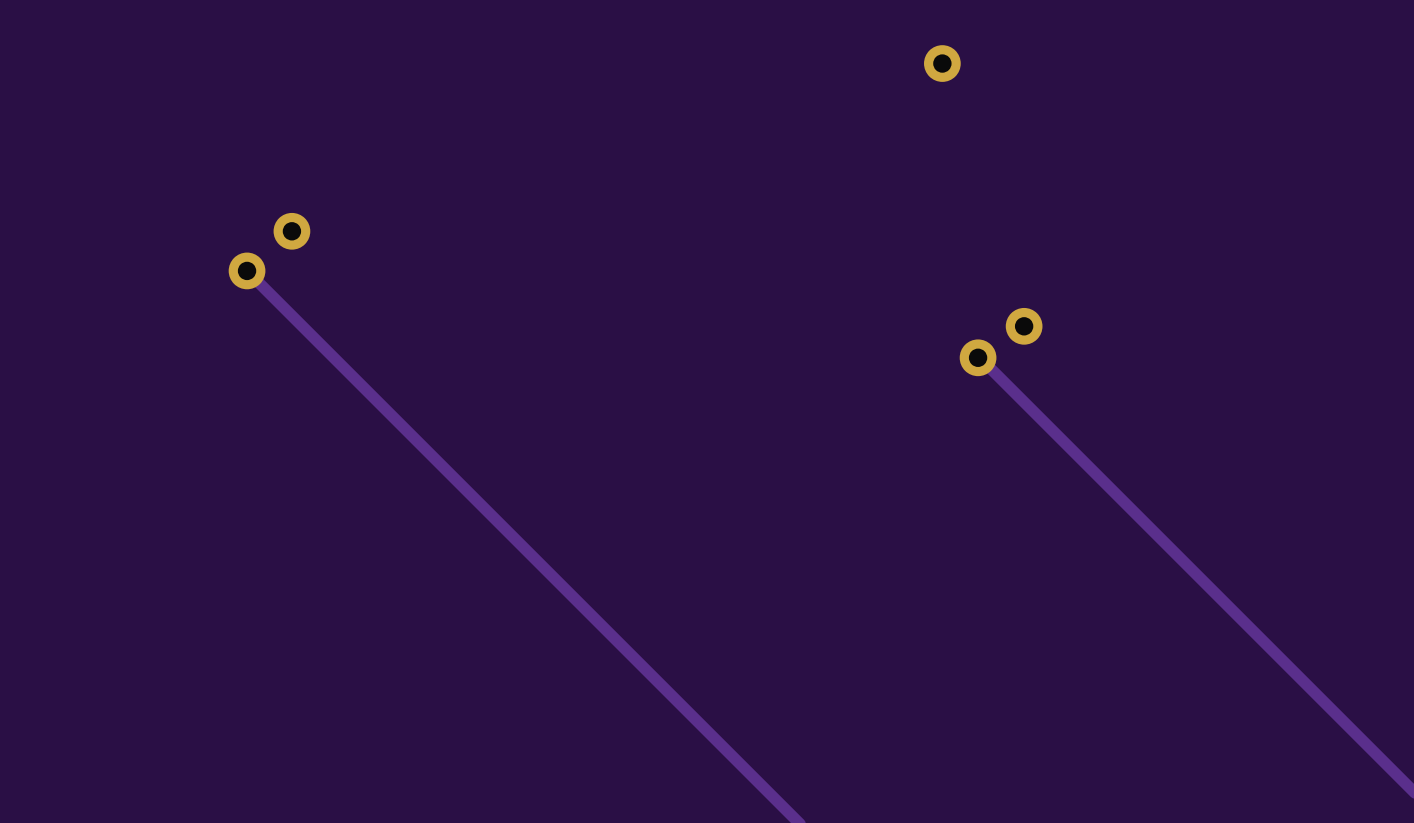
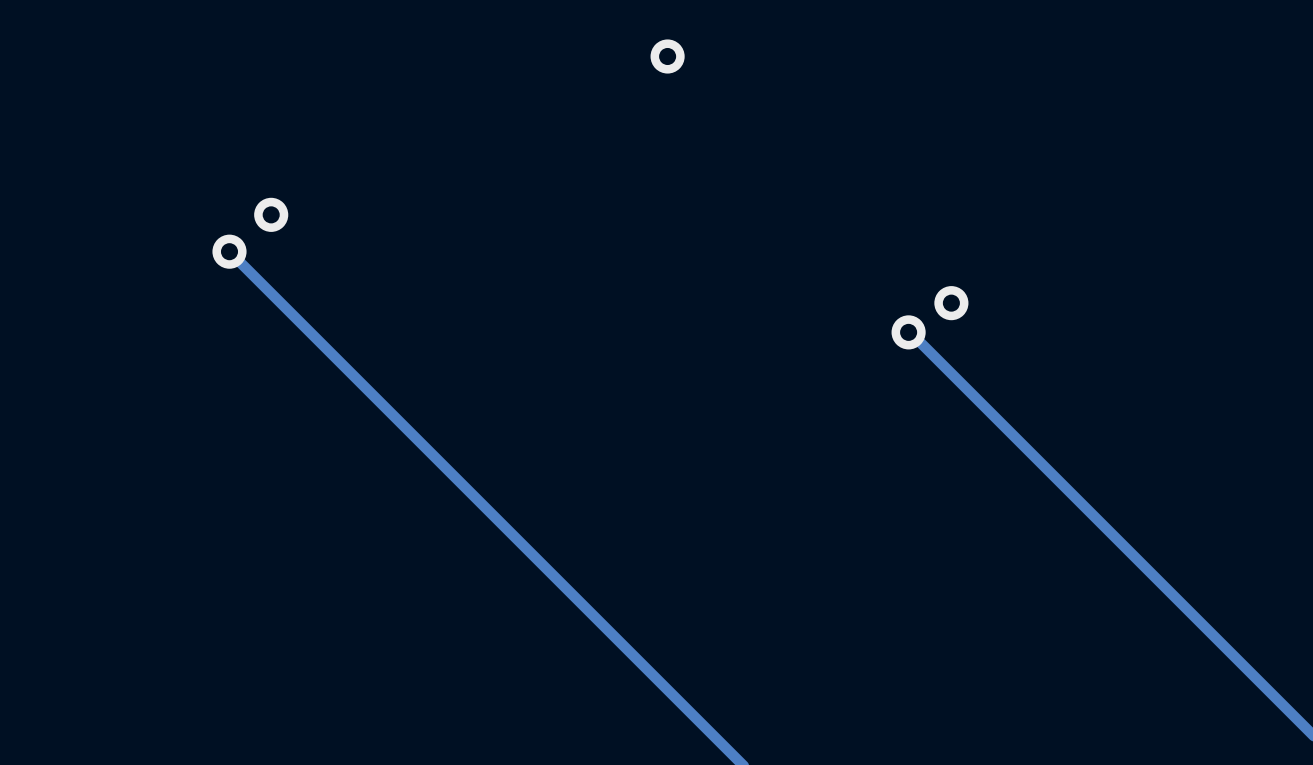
via position: (942, 63) -> (667, 56)

